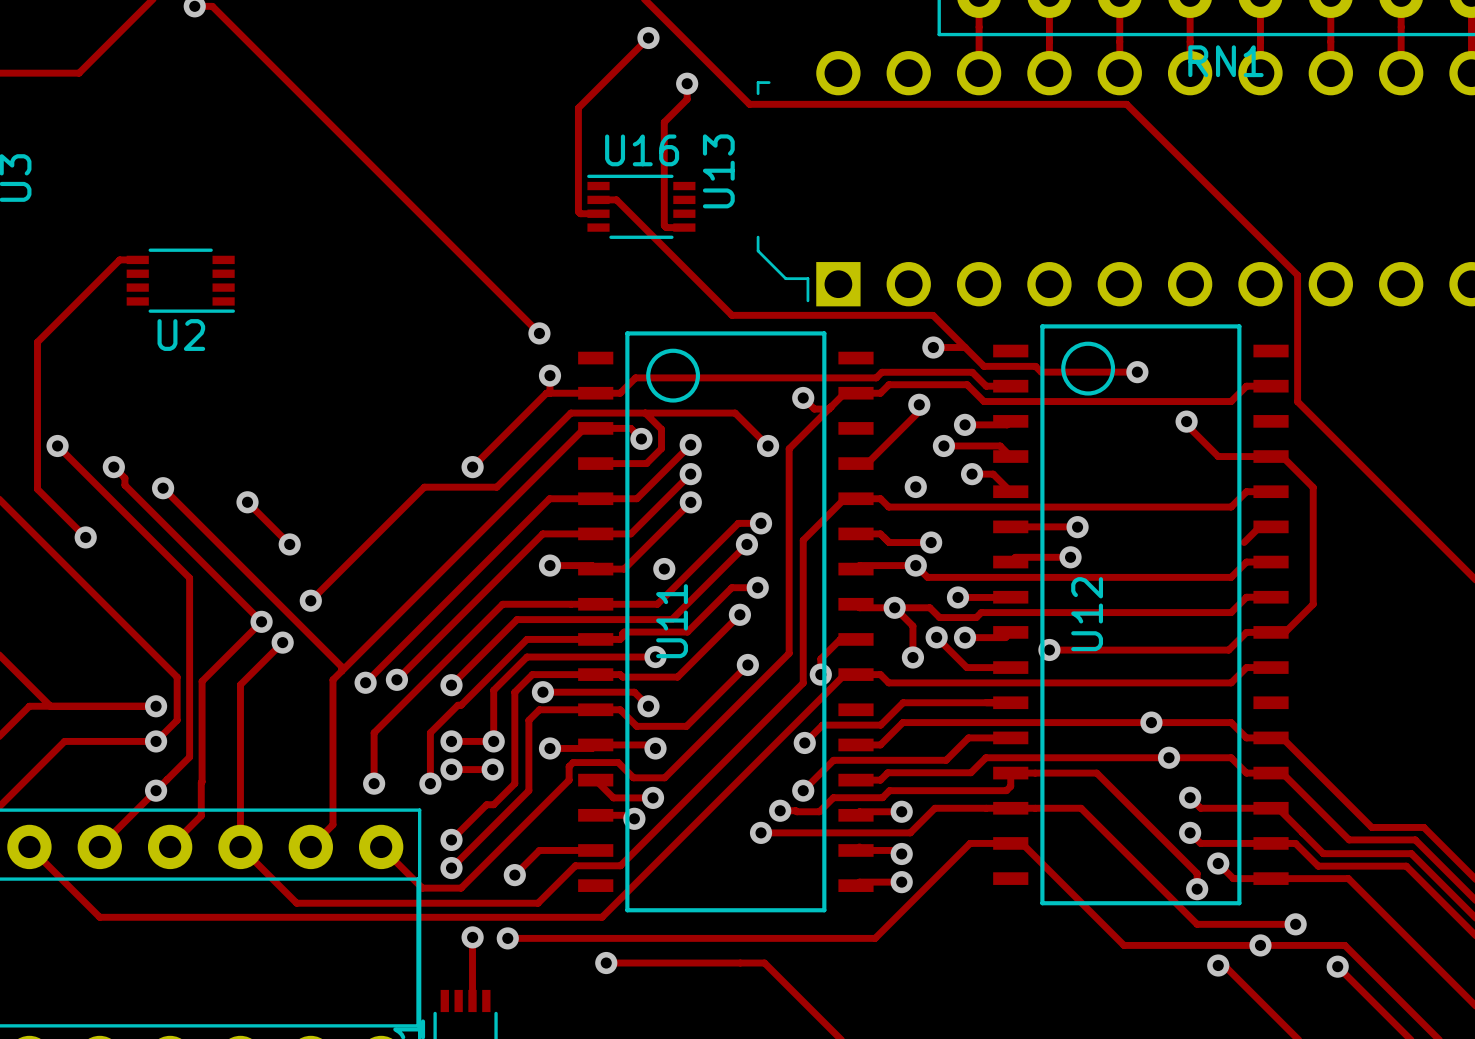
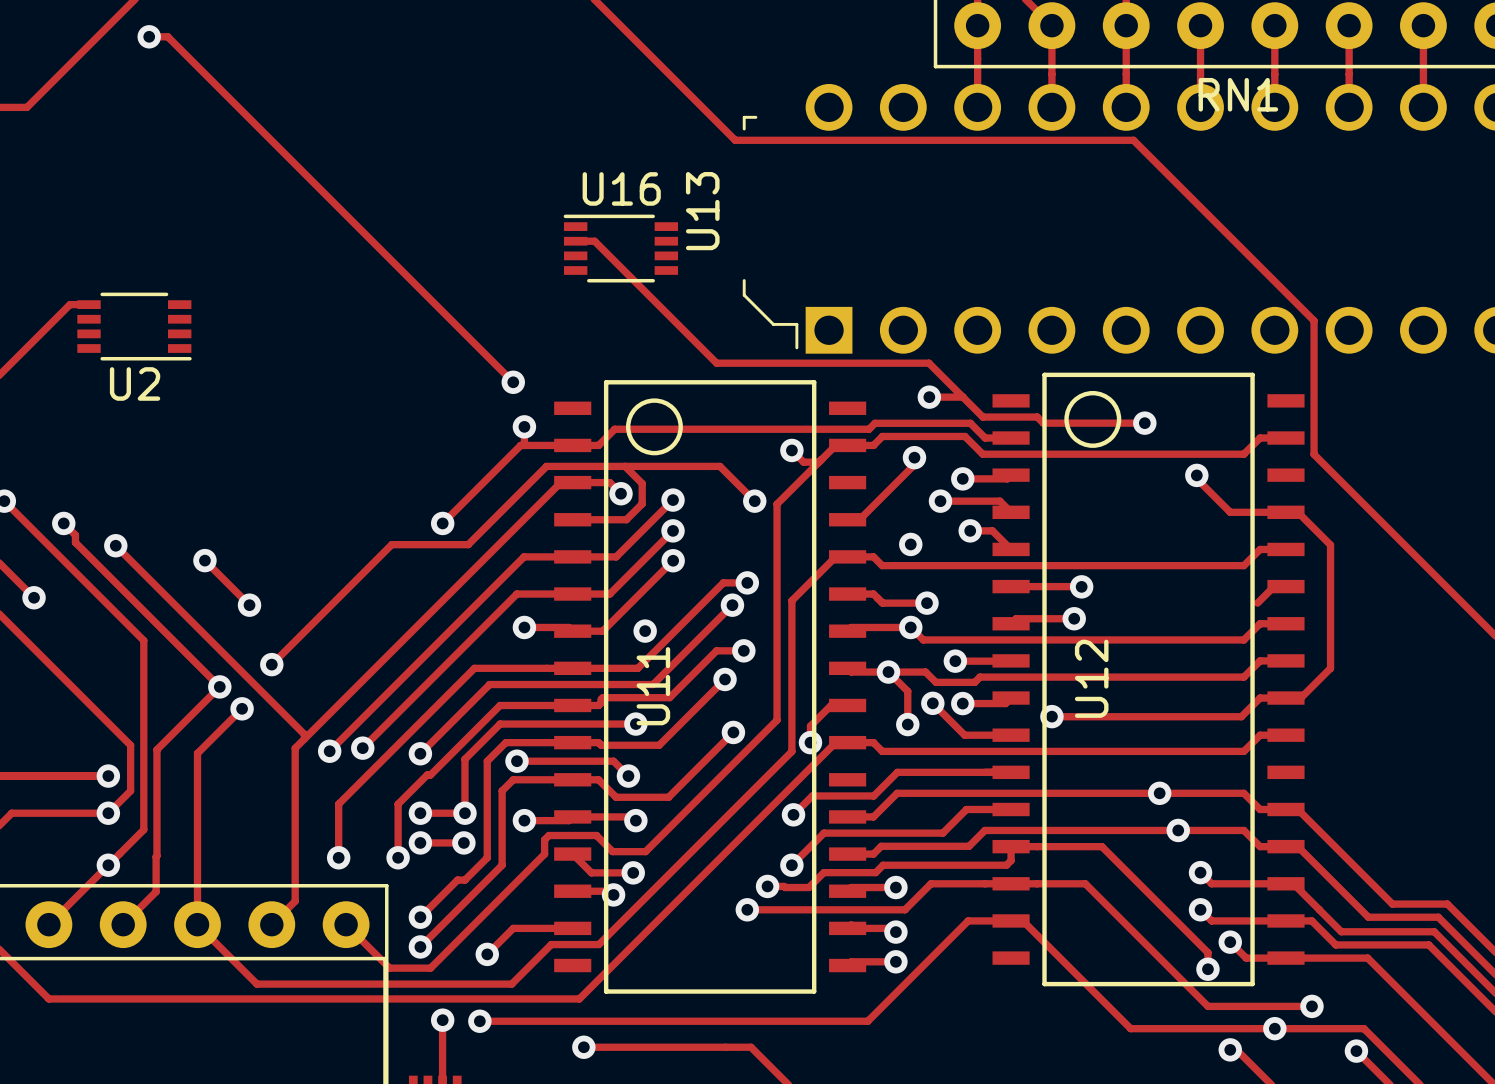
track: (648, 37) (578, 108) (578, 211) (580, 213) (598, 213) -> none
via: (648, 37) -> none
track: (687, 83) (687, 99) (664, 122) (664, 225) (666, 227) (684, 227) -> none
via: (687, 83) -> none

